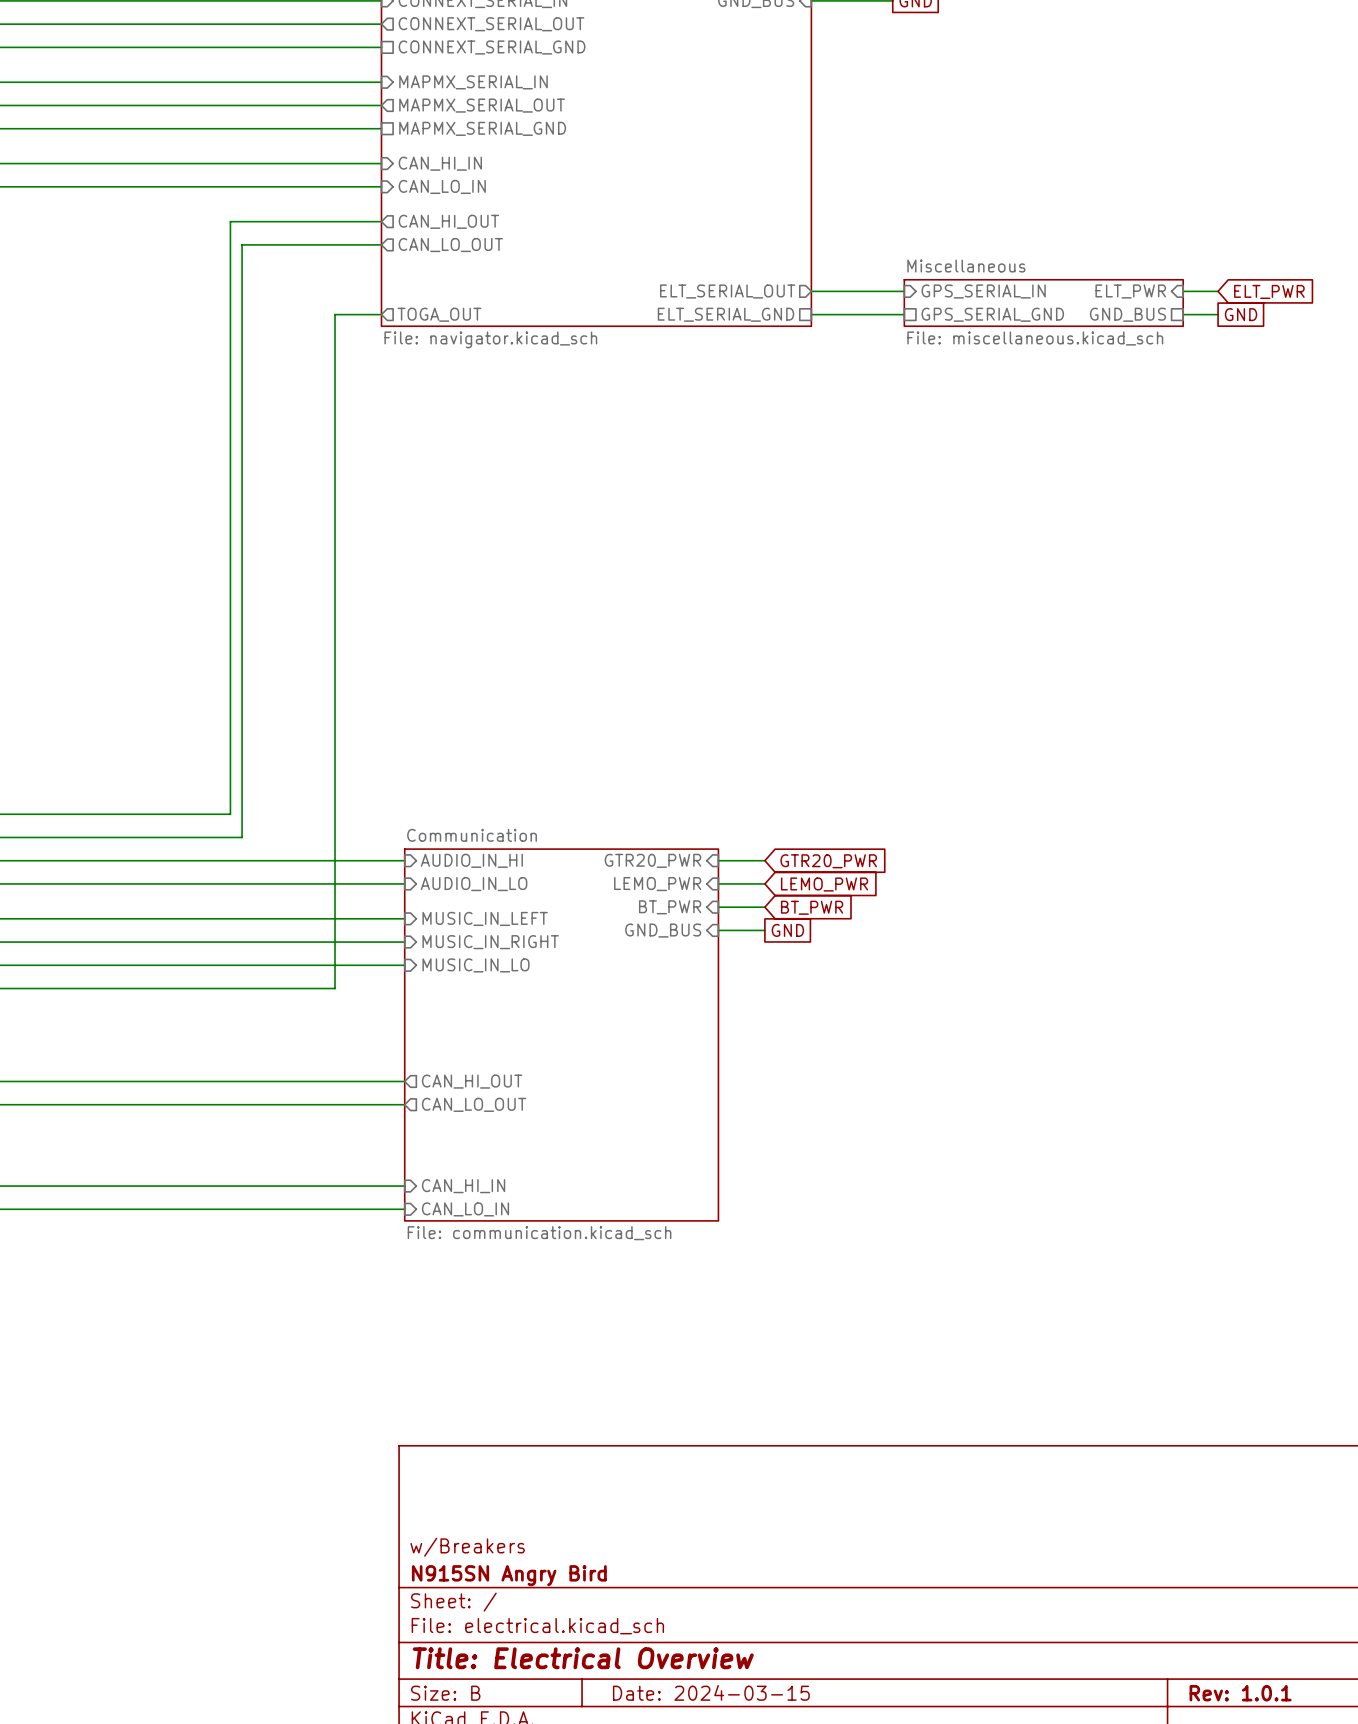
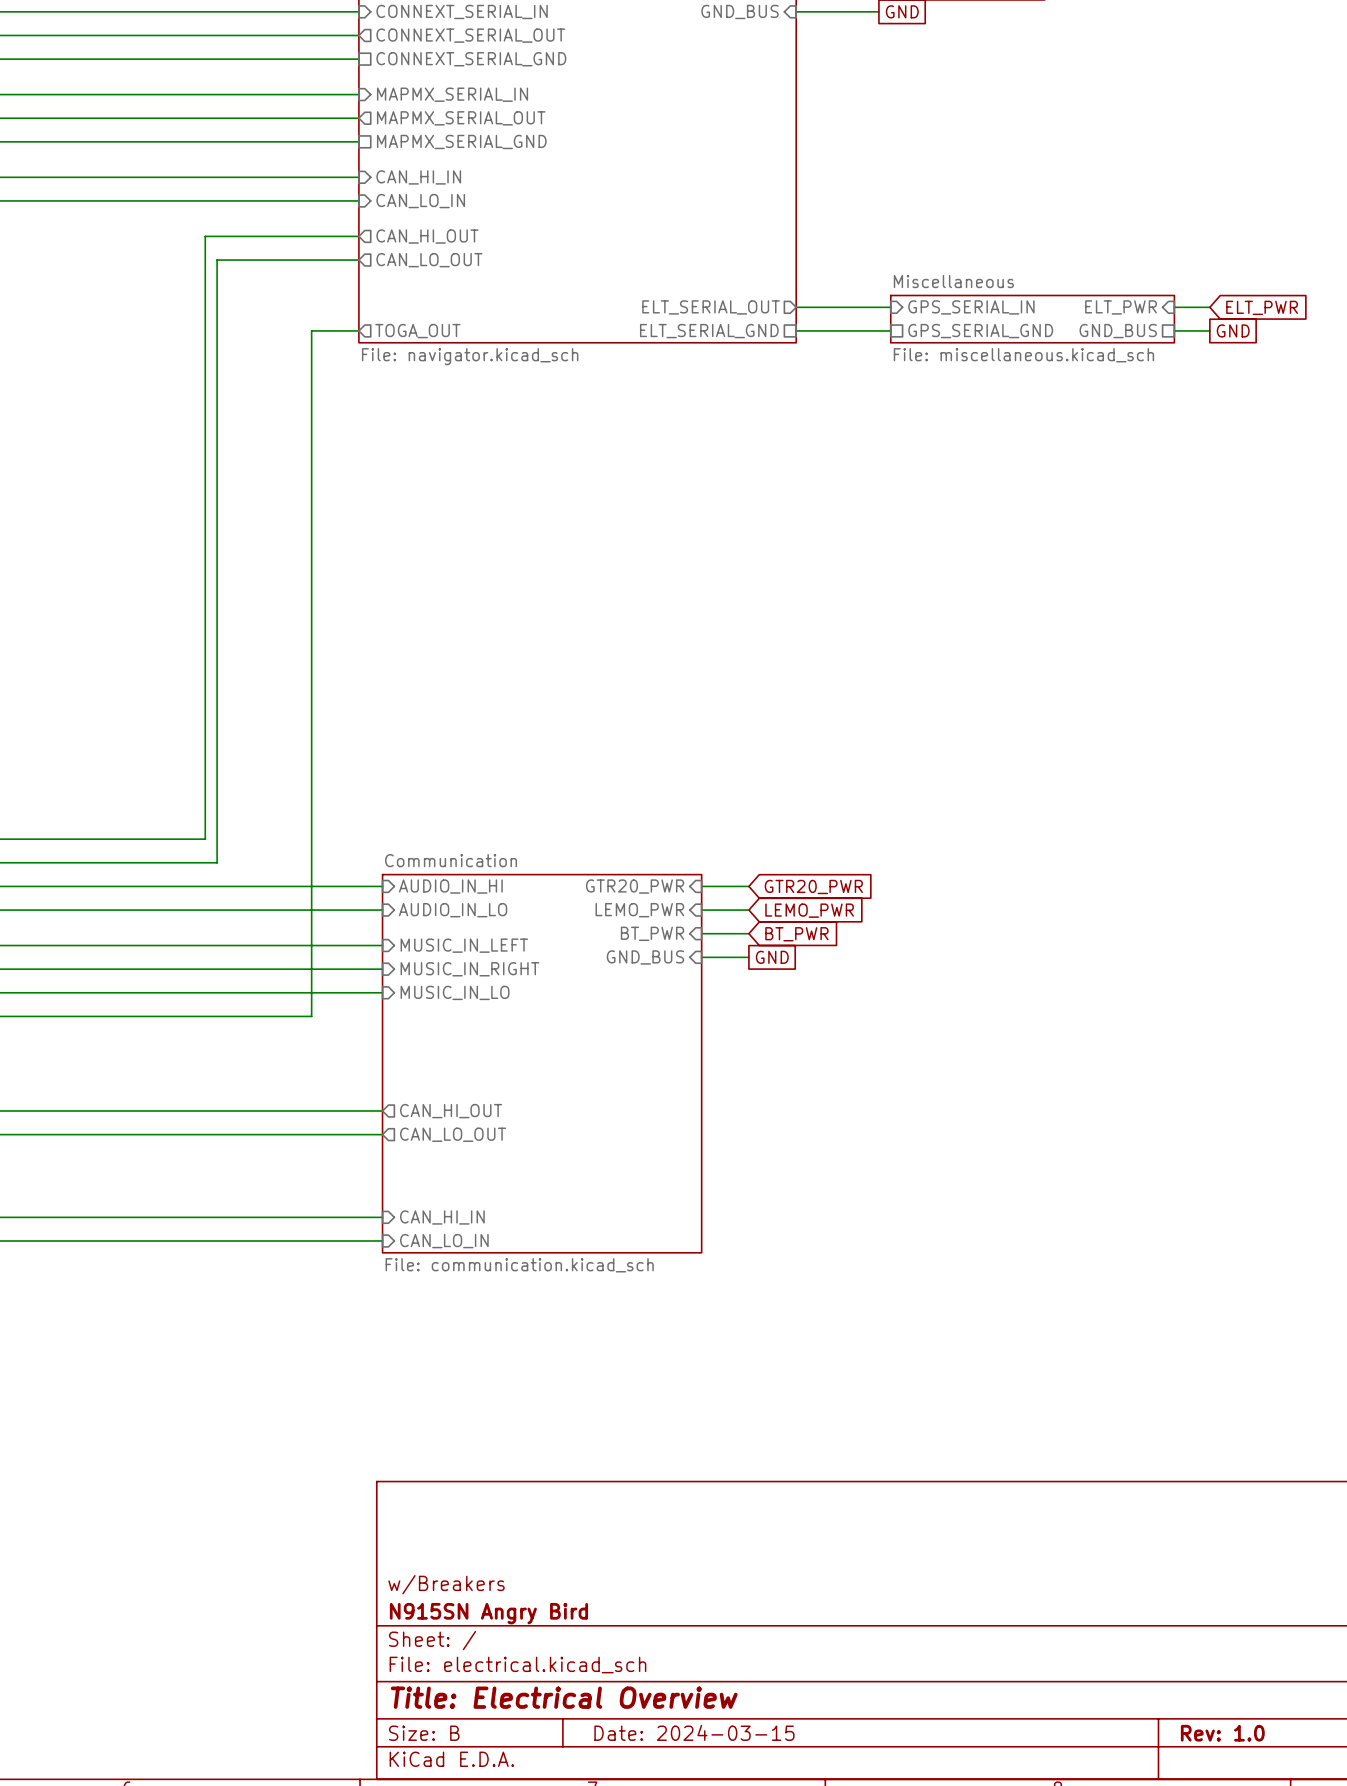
title block: Rev: 1.0.1 (1240, 1693) -> Rev: 1.0 (1222, 1733)

